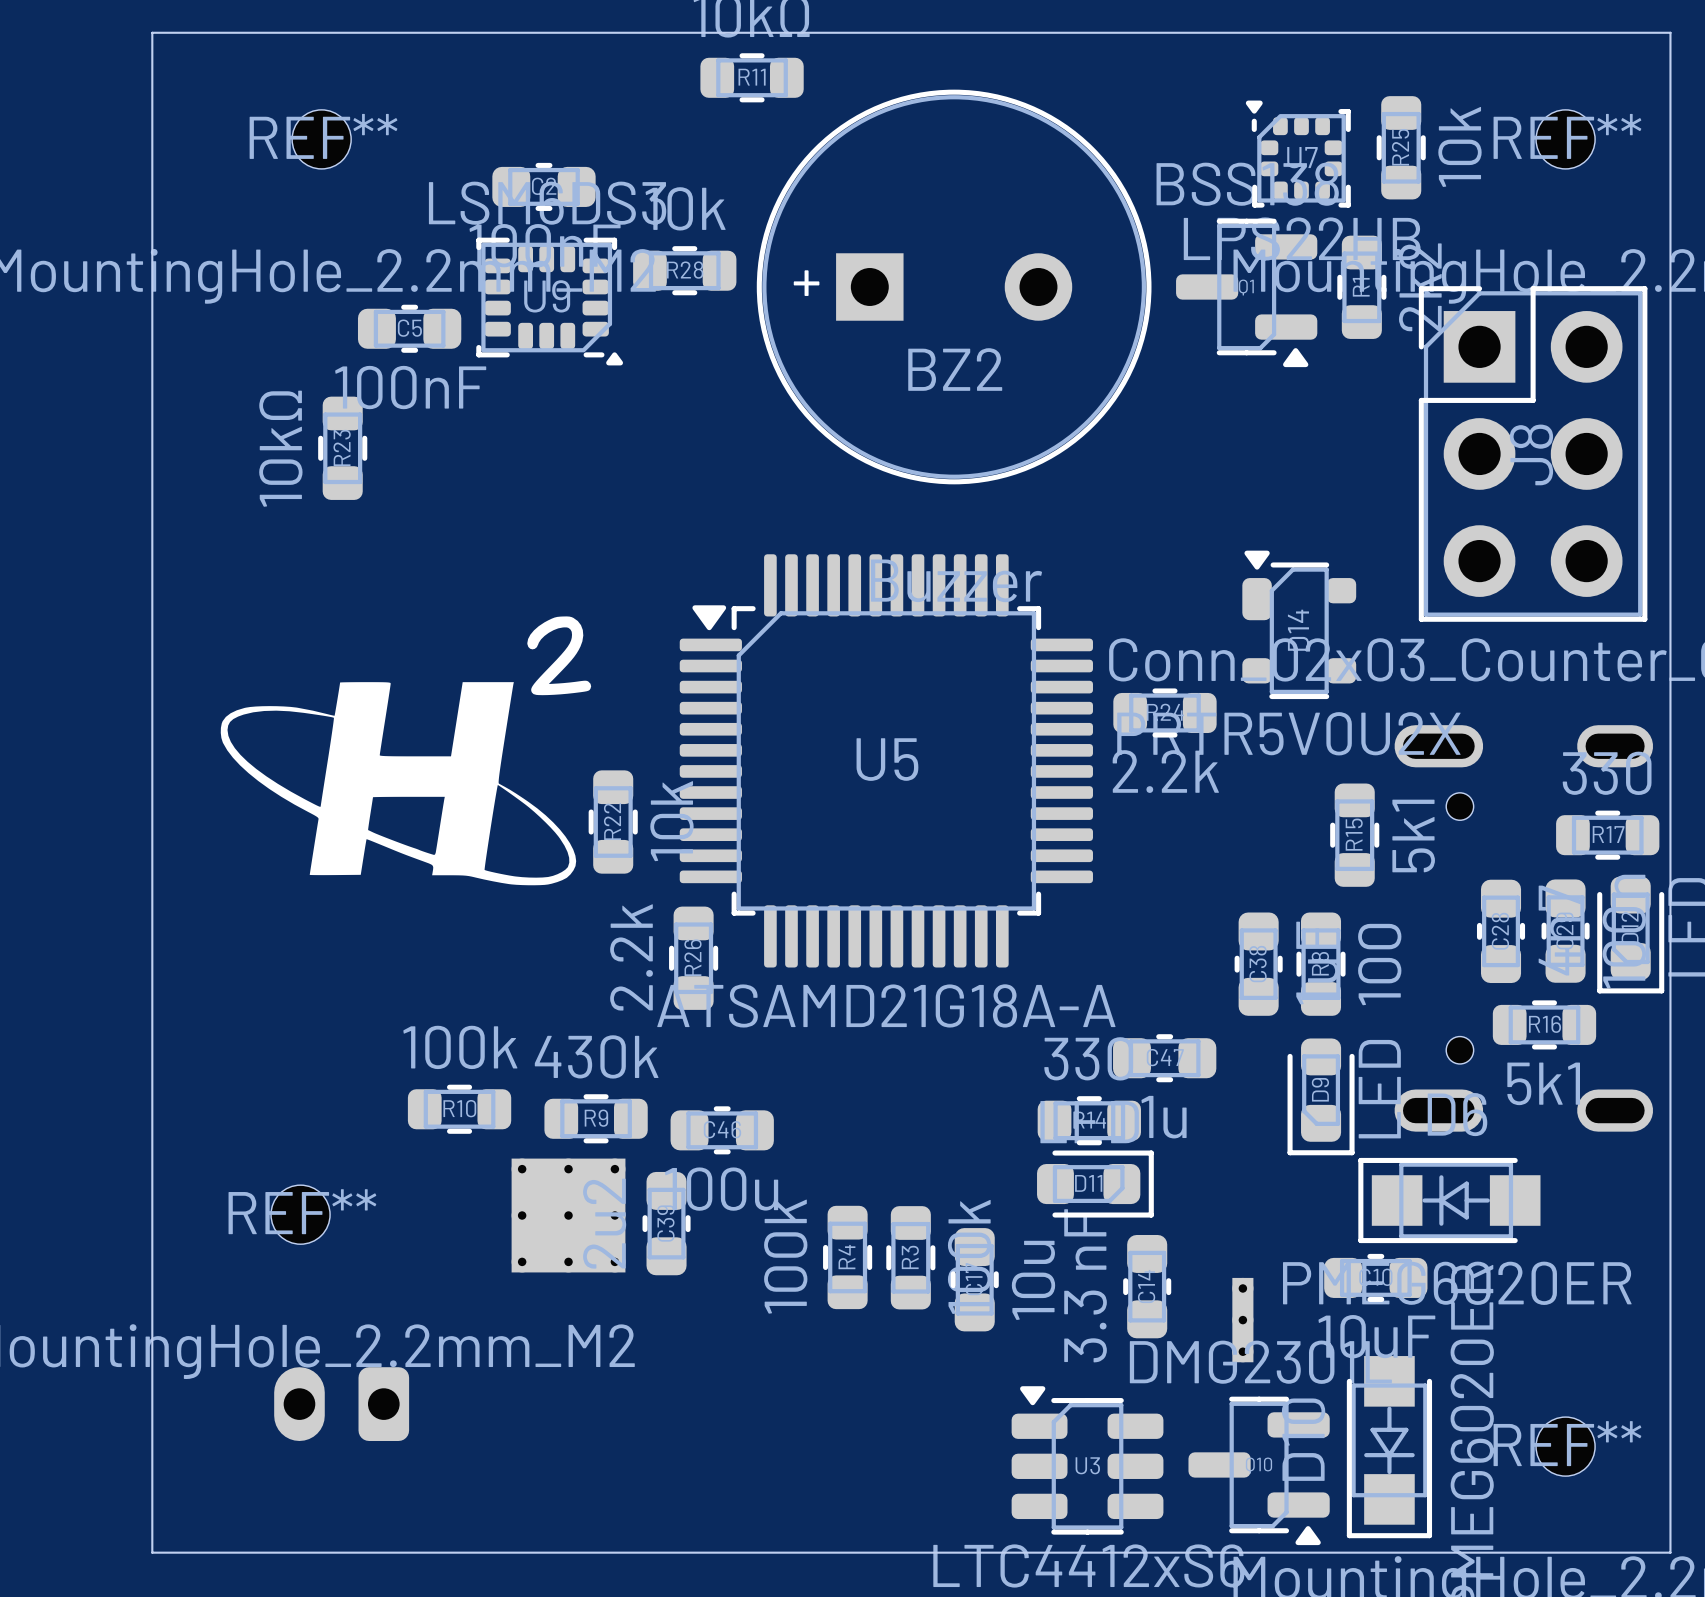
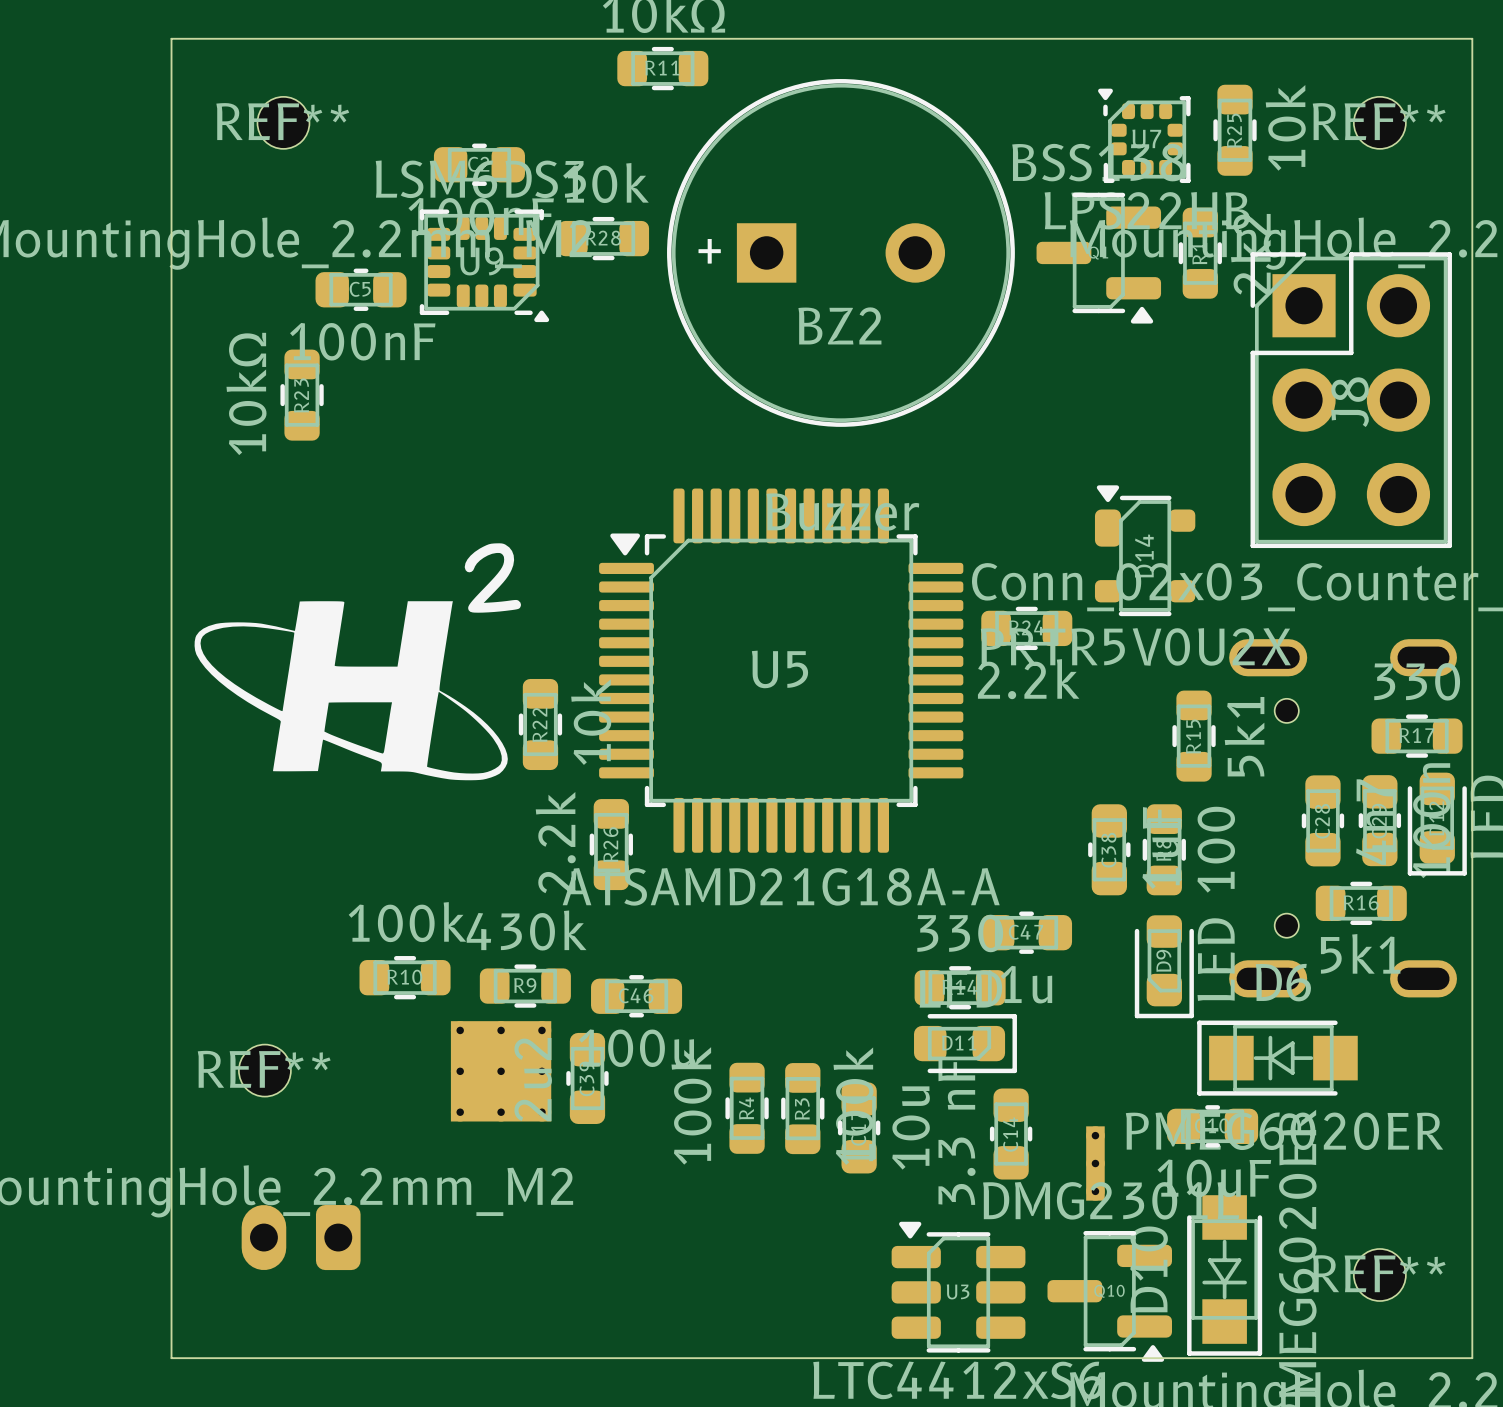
board edge: (1670, 44) (1670, 32) (152, 32) (152, 1552) (1670, 1552) (1670, 1540) -> (1472, 38) (171, 38) (171, 1358) (1472, 1358)

